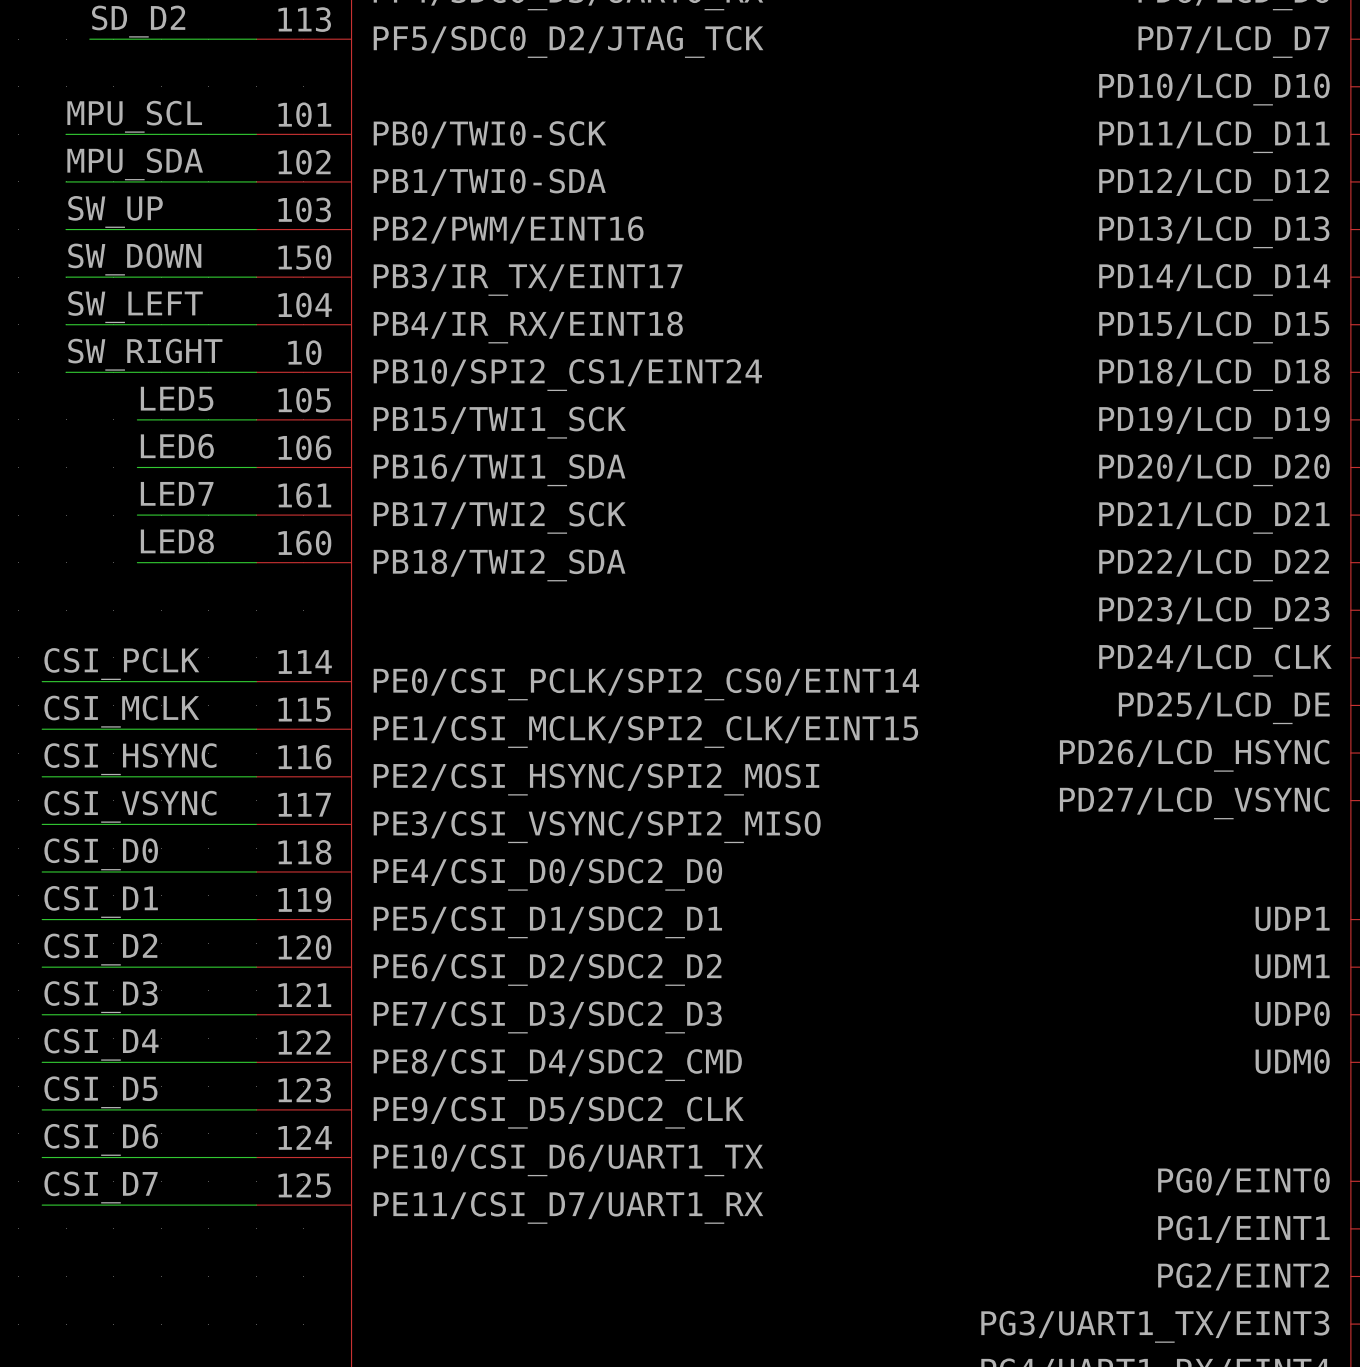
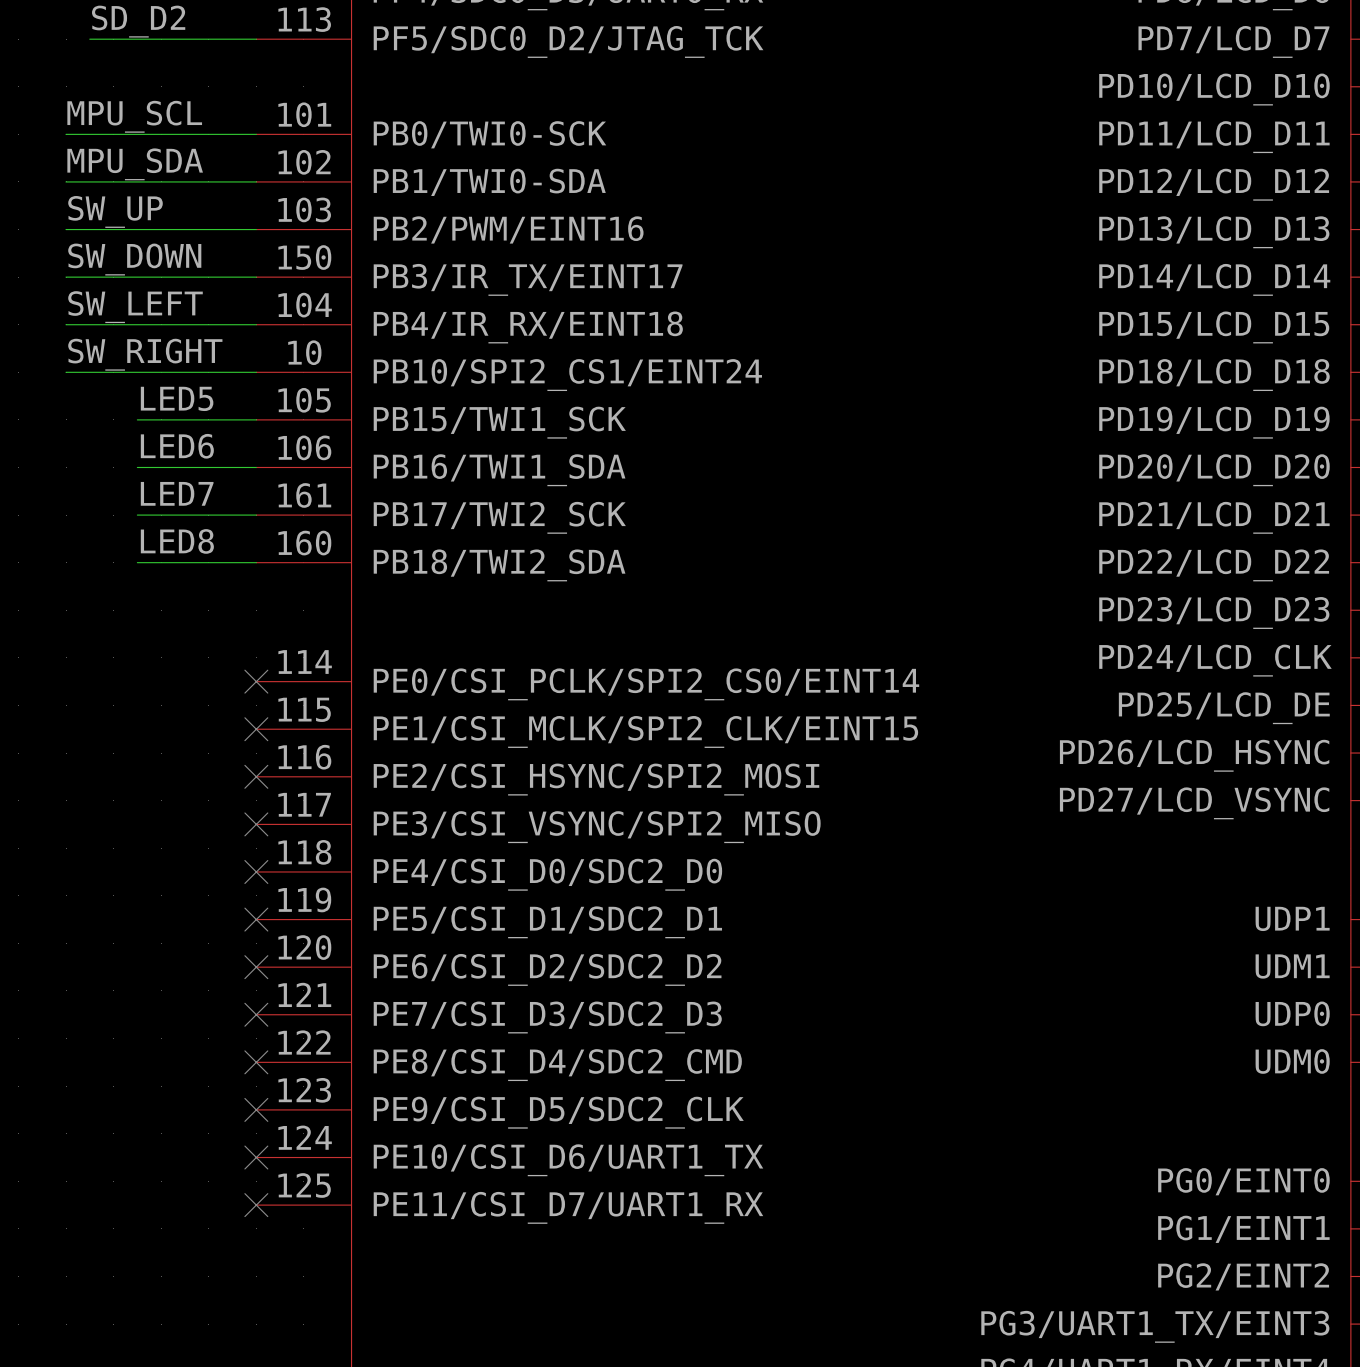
label: CSI_PCLK (121, 664) -> none
wire: (42, 681) (256, 681) -> none
no-connect mark: none -> (256, 681)
label: CSI_MCLK (121, 711) -> none
wire: (42, 729) (256, 729) -> none
no-connect mark: none -> (256, 729)
label: CSI_HSYNC (130, 759) -> none
wire: (42, 776) (256, 776) -> none
no-connect mark: none -> (256, 776)
label: CSI_VSYNC (130, 806) -> none
wire: (42, 824) (256, 824) -> none
no-connect mark: none -> (256, 824)
label: CSI_D0 (101, 854) -> none
wire: (42, 871) (256, 871) -> none
no-connect mark: none -> (256, 871)
label: CSI_D1 (101, 901) -> none
wire: (42, 919) (256, 919) -> none
no-connect mark: none -> (256, 919)
label: CSI_D2 (100, 949) -> none
wire: (42, 967) (256, 967) -> none
no-connect mark: none -> (256, 967)
label: CSI_D3 (101, 997) -> none
wire: (42, 1014) (256, 1014) -> none
no-connect mark: none -> (256, 1014)
label: CSI_D4 (101, 1044) -> none
wire: (42, 1062) (256, 1062) -> none
no-connect mark: none -> (256, 1062)
label: CSI_D5 (100, 1092) -> none
wire: (42, 1109) (256, 1109) -> none
no-connect mark: none -> (256, 1109)
label: CSI_D6 (101, 1139) -> none
wire: (42, 1157) (256, 1157) -> none
no-connect mark: none -> (256, 1157)
label: CSI_D7 (101, 1187) -> none
wire: (42, 1205) (256, 1205) -> none
no-connect mark: none -> (256, 1205)

